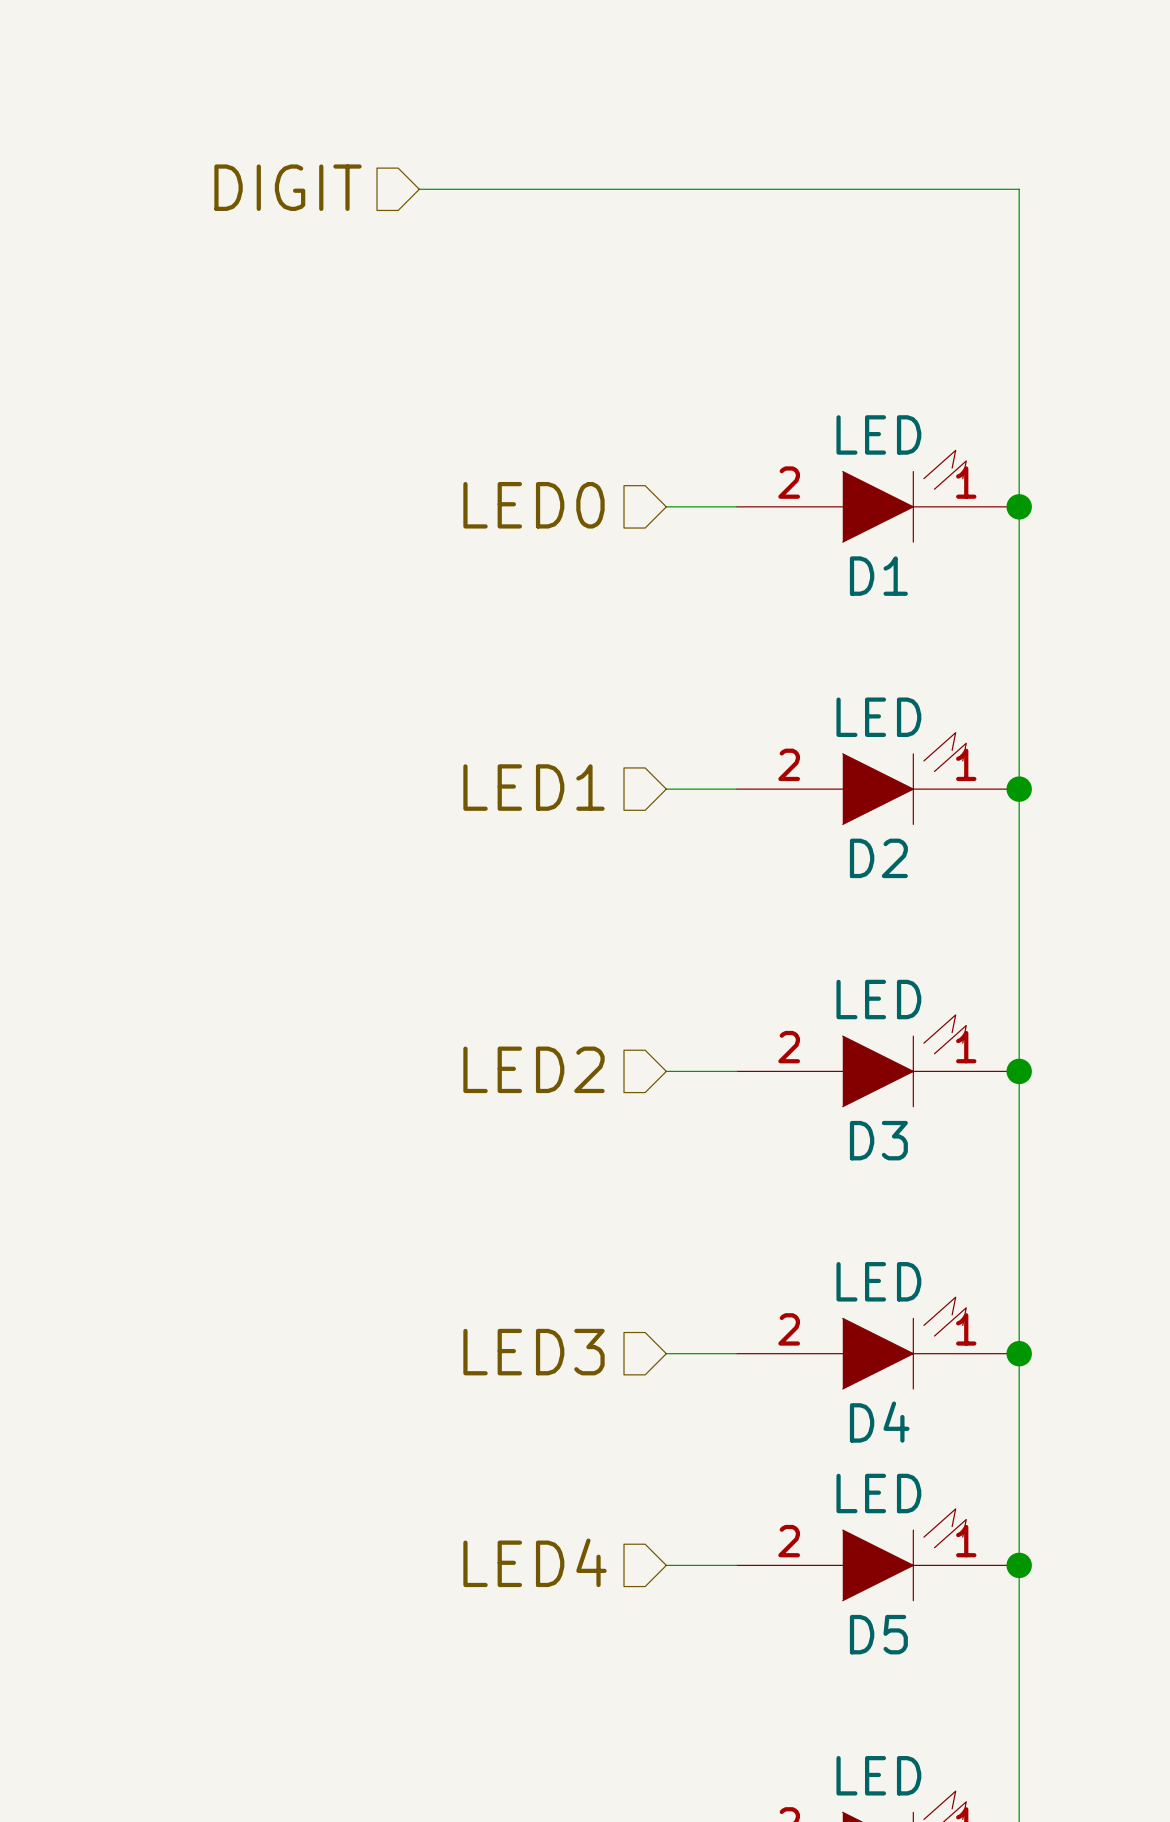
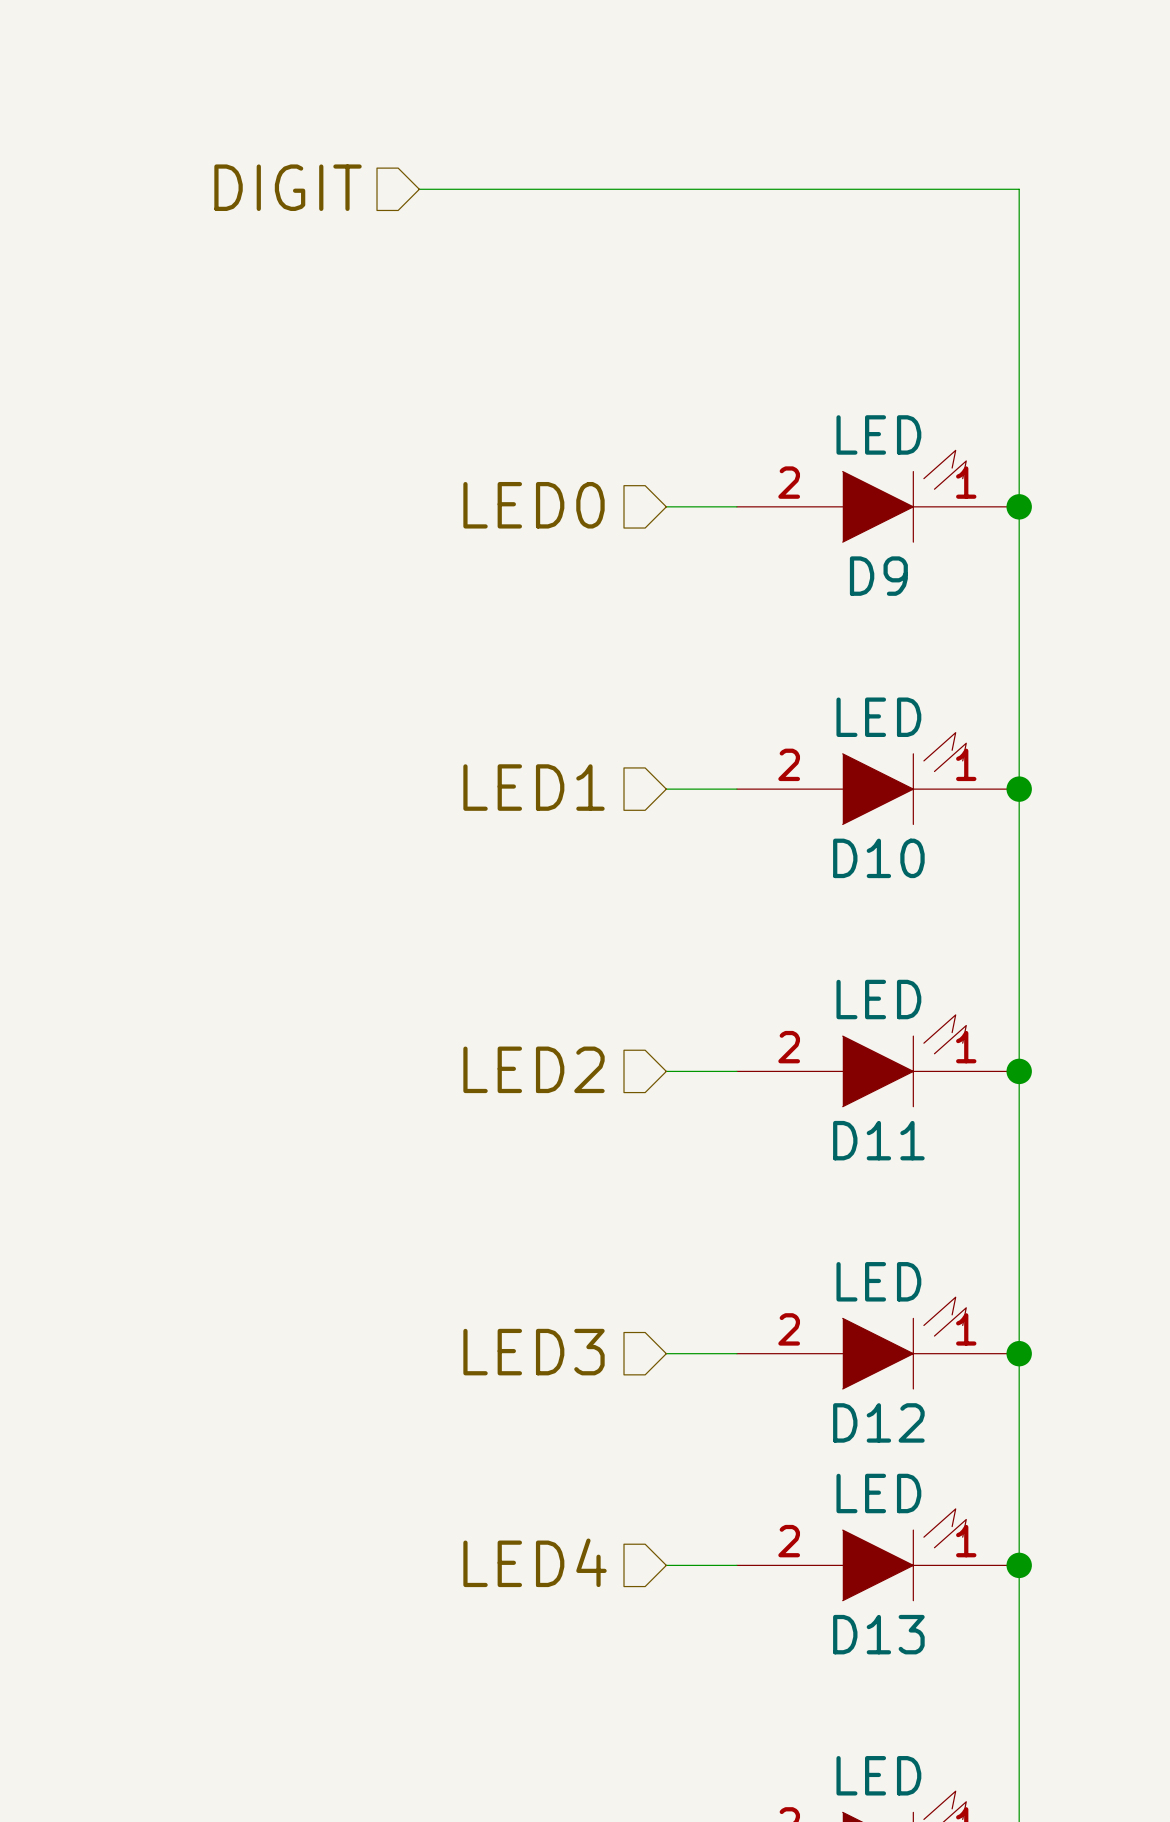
D1 name: D1 (878, 576) -> D9 (878, 576)
D2 name: D2 (878, 858) -> D10 (878, 858)
D3 name: D3 (878, 1140) -> D11 (878, 1140)
D4 name: D4 (879, 1422) -> D12 (878, 1422)
D5 name: D5 (878, 1634) -> D13 (878, 1634)

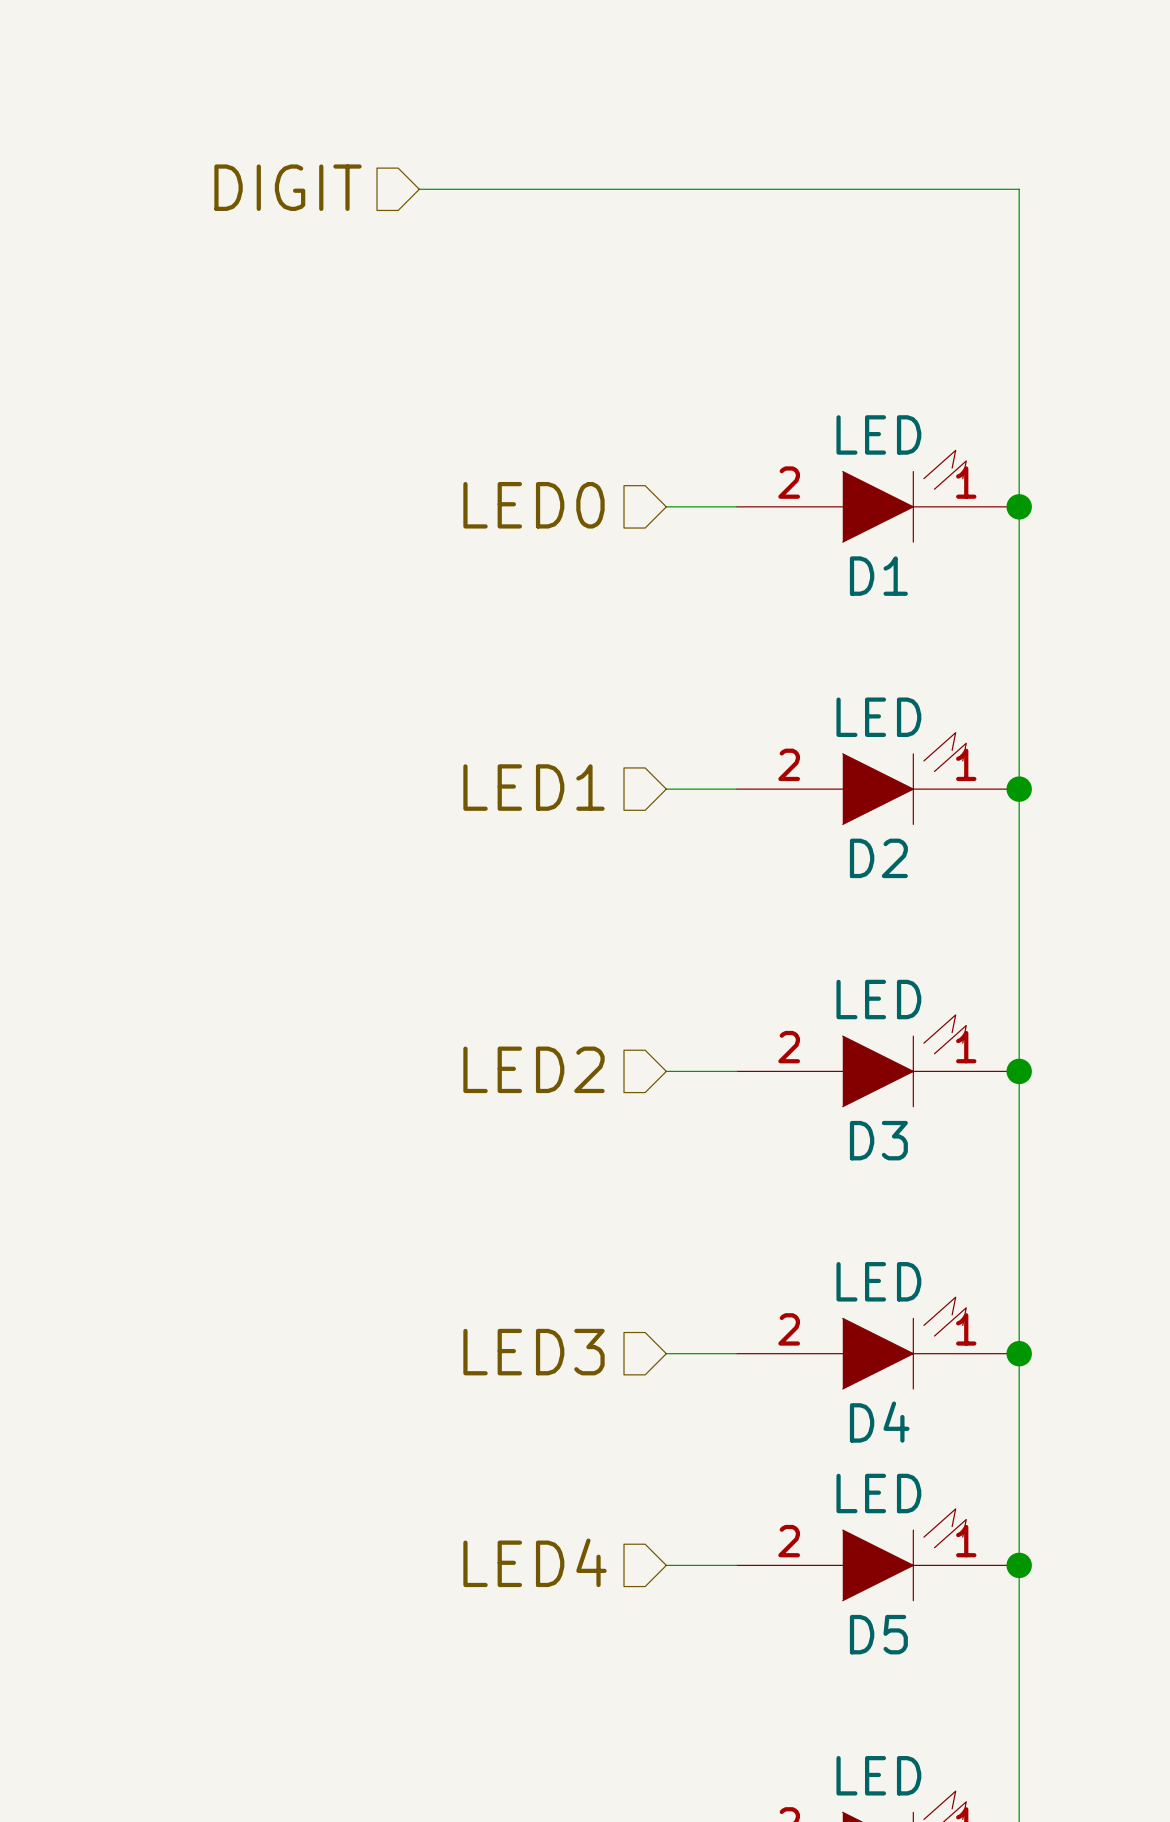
D9 name: D9 (878, 576) -> D1 (878, 576)
D10 name: D10 (878, 858) -> D2 (878, 858)
D11 name: D11 (878, 1140) -> D3 (878, 1140)
D12 name: D12 (878, 1422) -> D4 (879, 1422)
D13 name: D13 (878, 1634) -> D5 (878, 1634)

